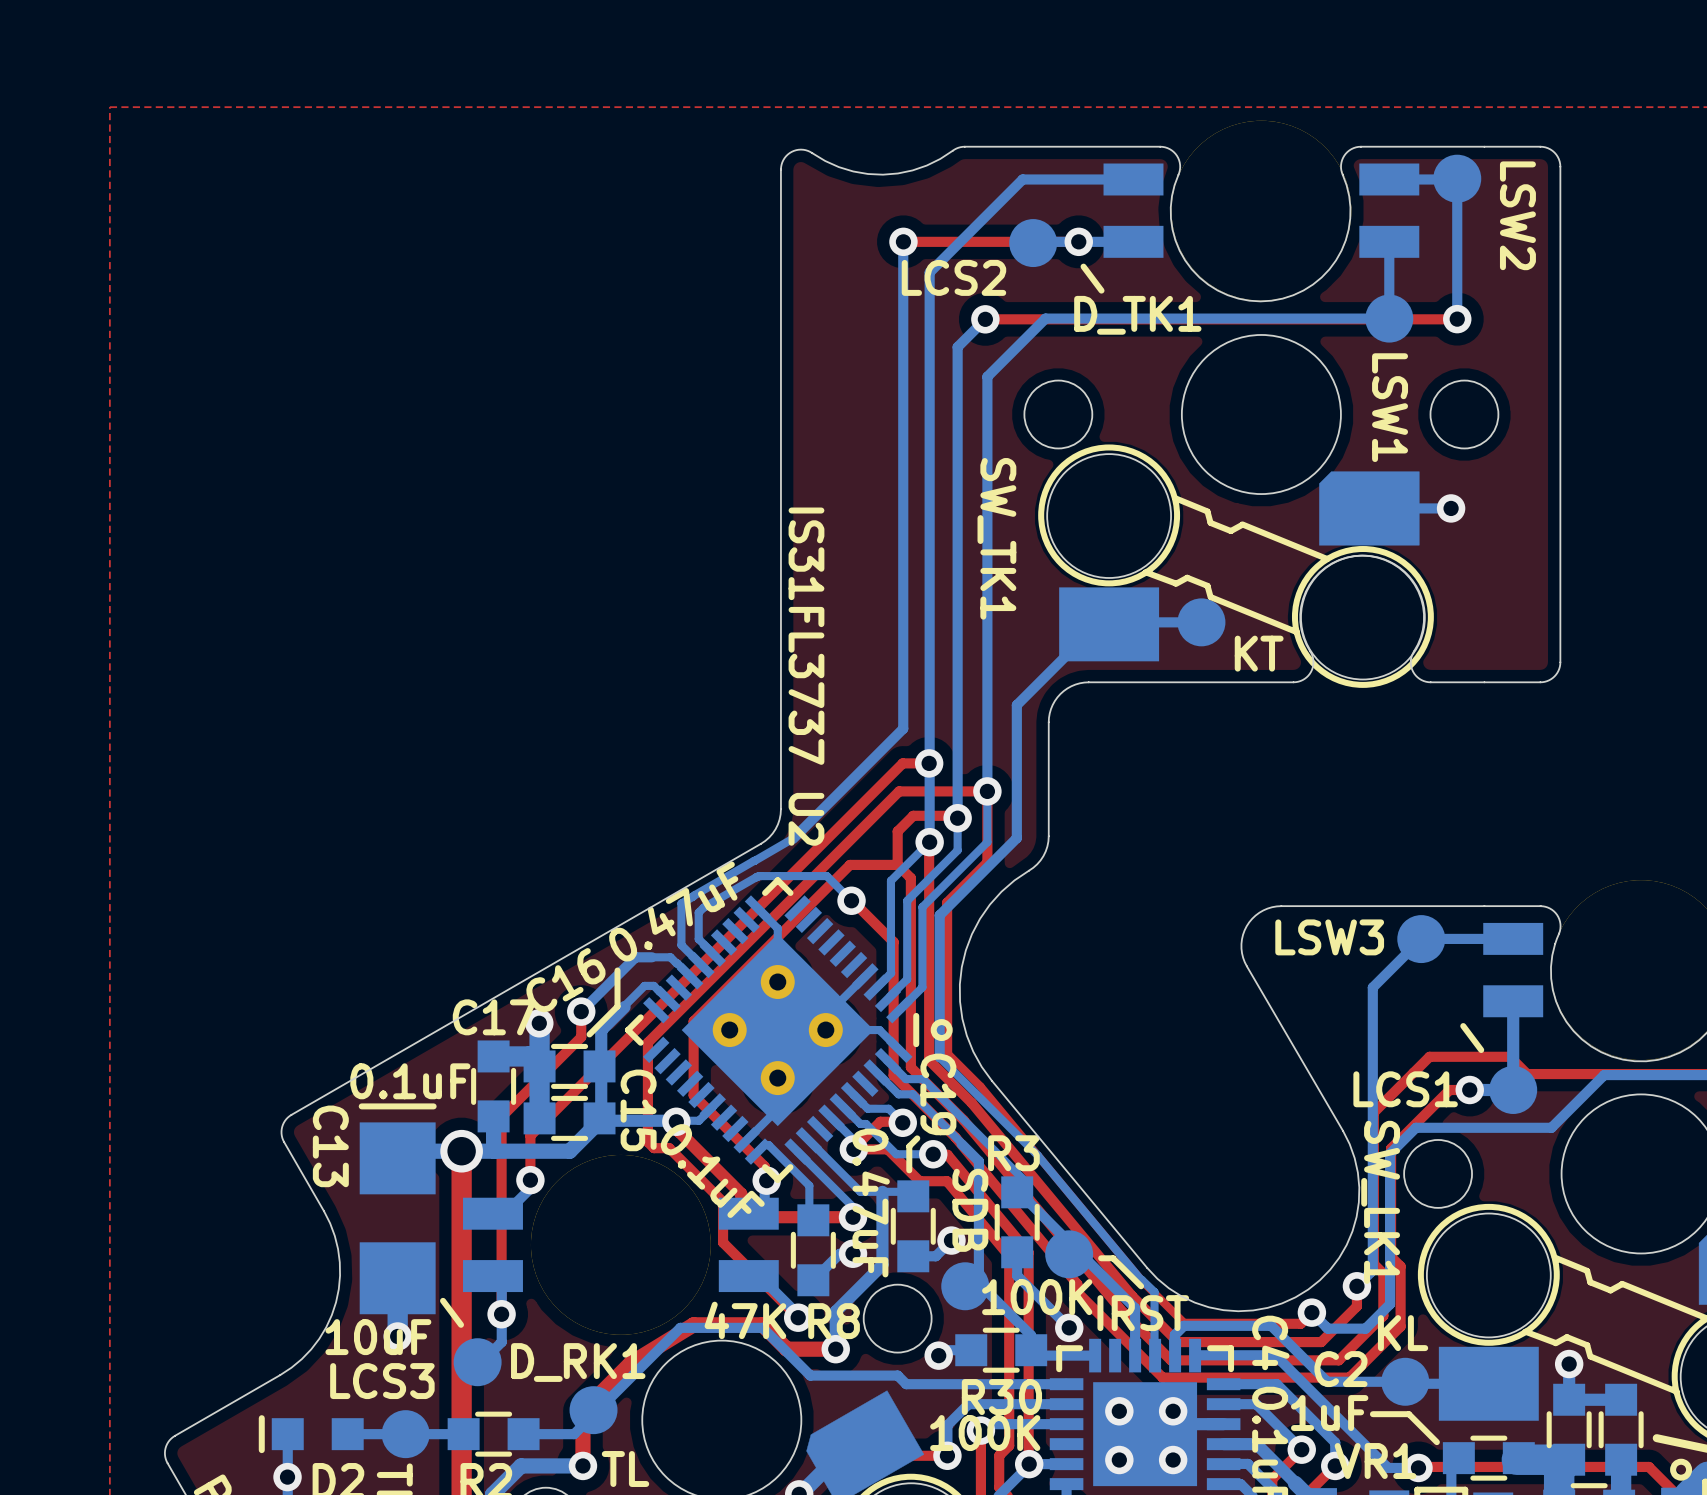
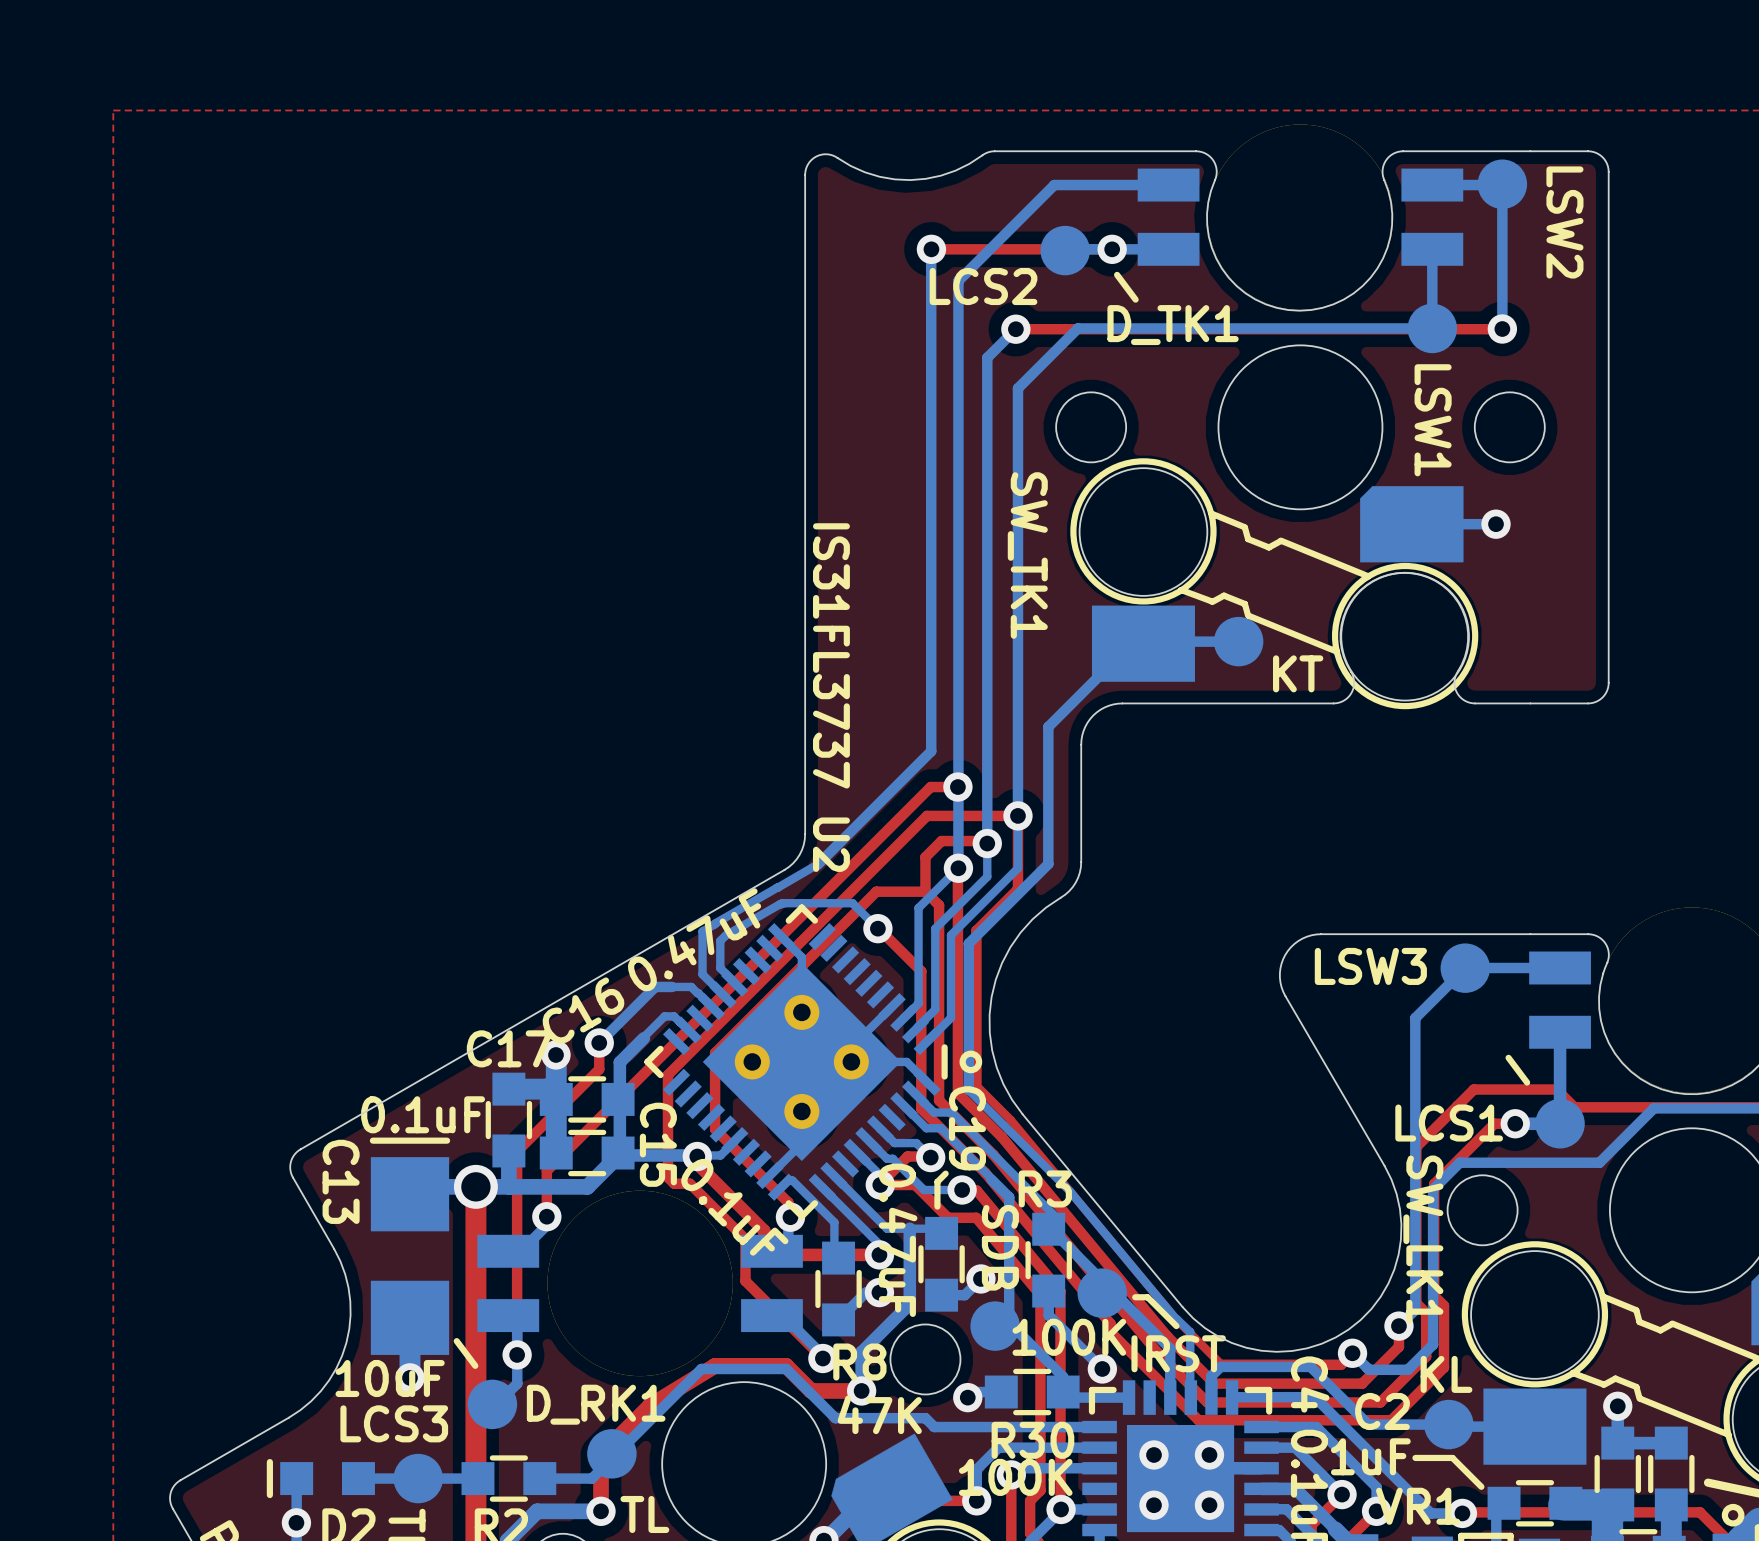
line: (617, 970) (617, 1006) (589, 1034) -> none
R8 value position: 47K (745, 1320) -> 47K (879, 1414)

